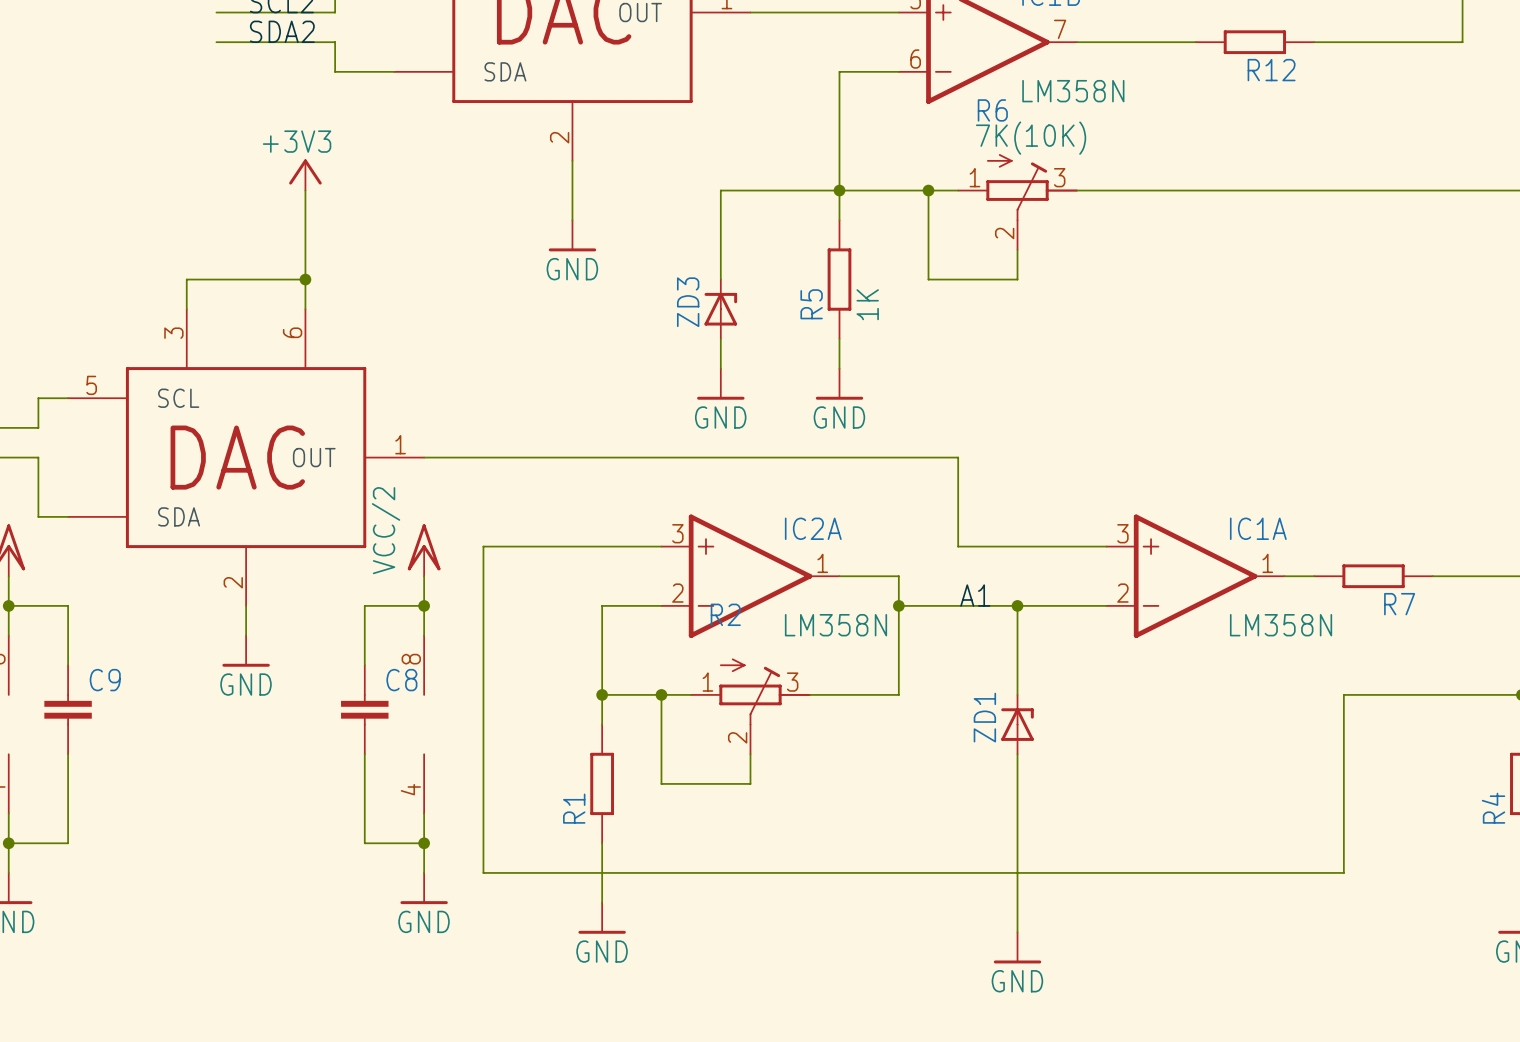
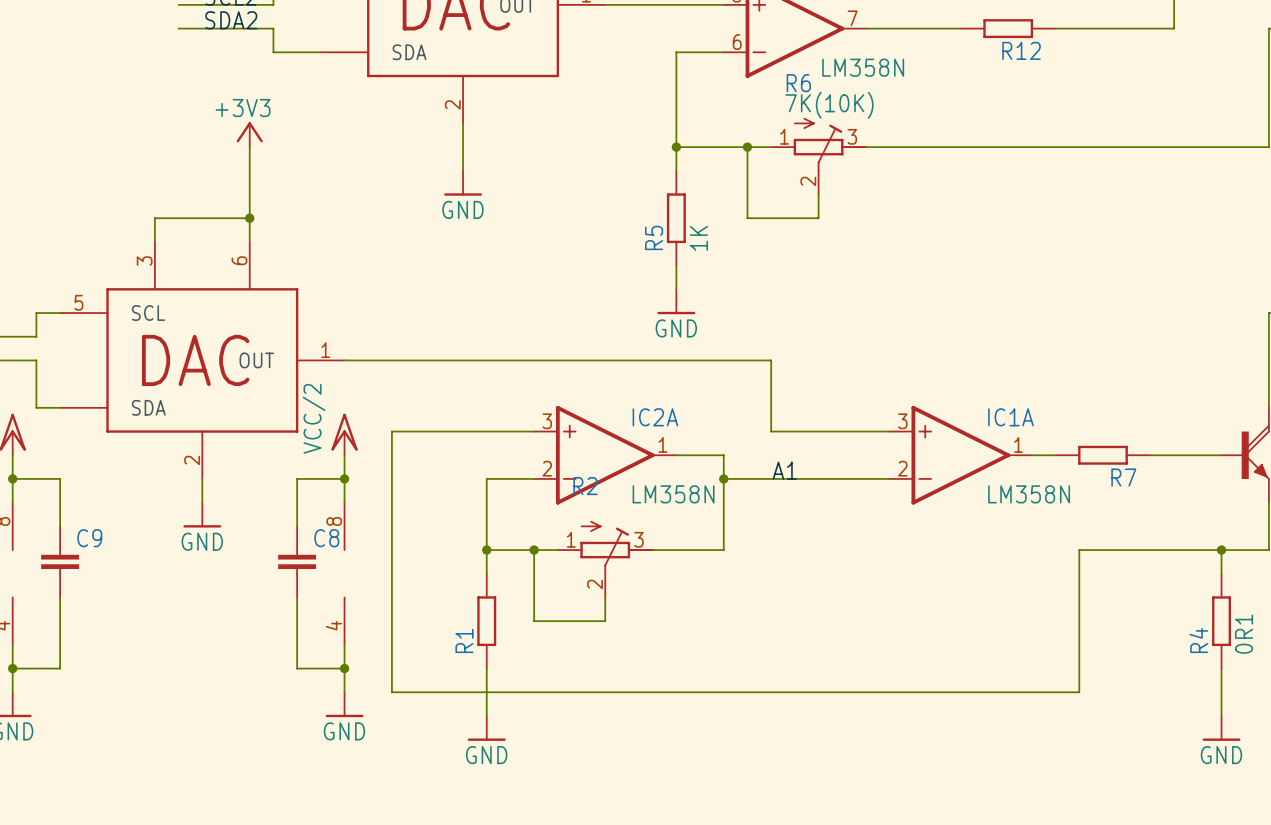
wire: (839, 190) (720, 190) (720, 279) -> none
ZD3: (720, 309) -> none
wire: (720, 338) (720, 368) -> none
power symbol: GND (720, 384) -> none
wire: (1017, 605) (1017, 694) -> none
junction: (1017, 605) -> none
ZD1: (1017, 724) -> none
wire: (1017, 754) (1017, 932) -> none
power symbol: GND (1017, 947) -> none

